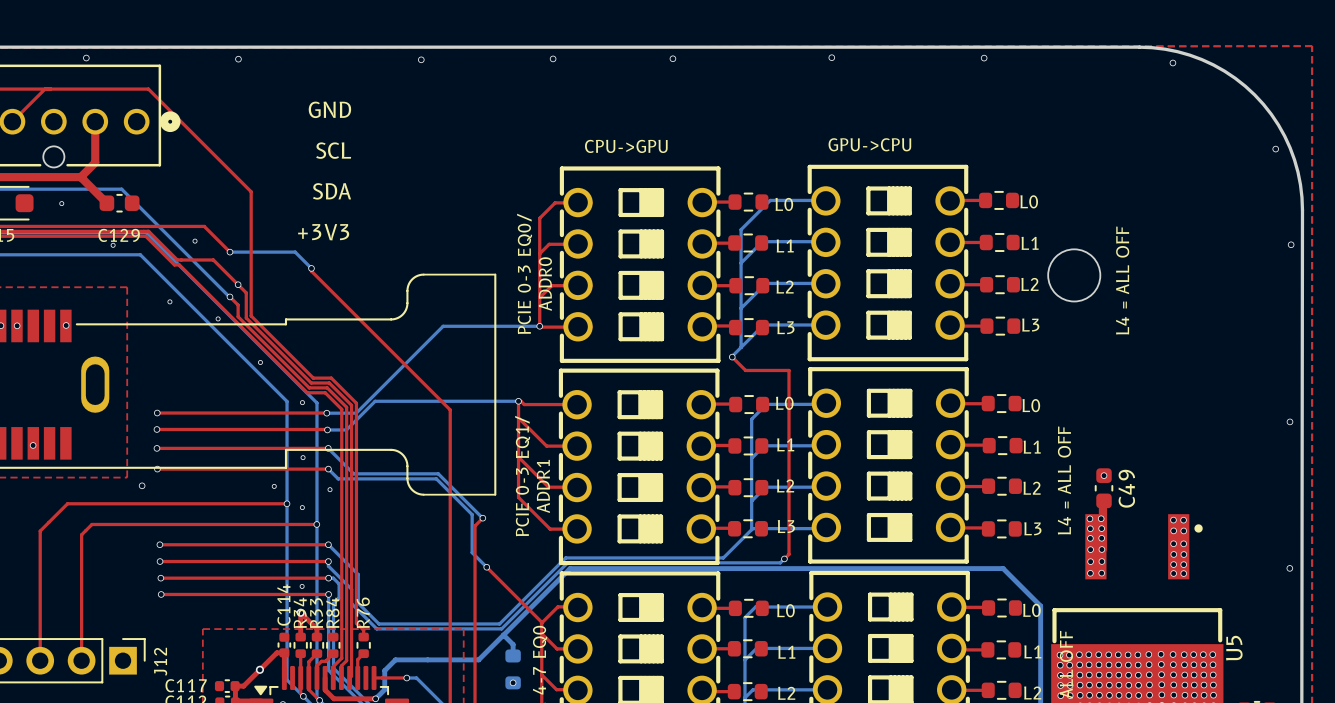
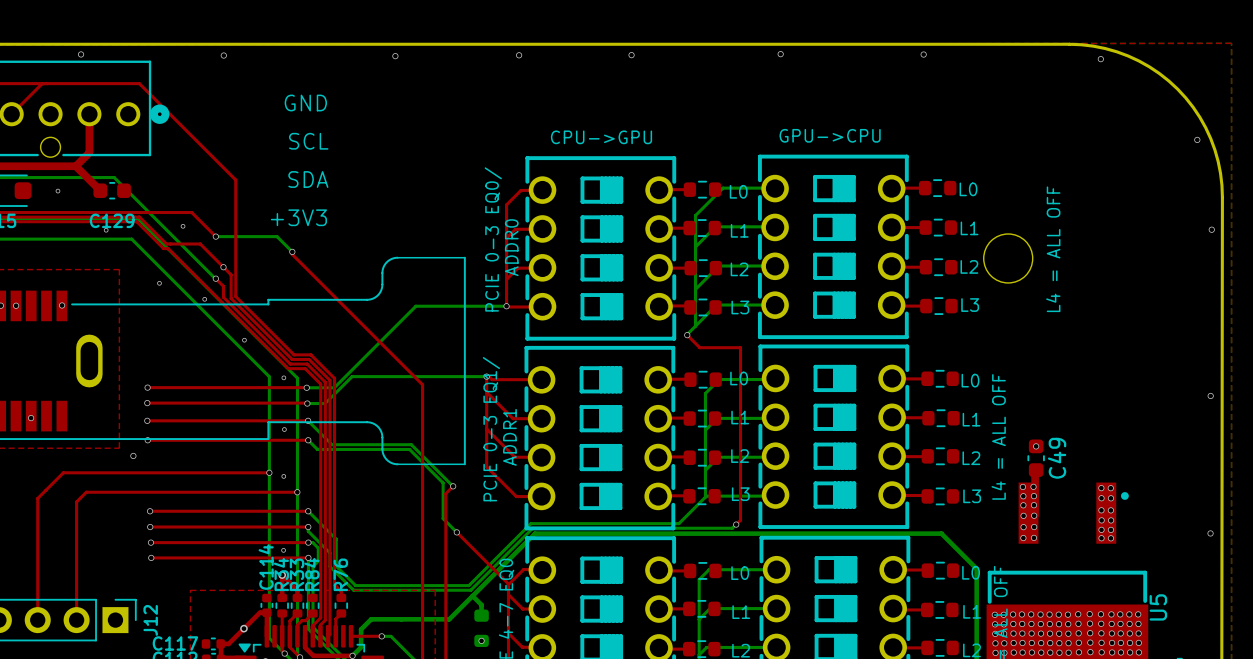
via: (274, 486) -> none
via: (330, 489) -> none

